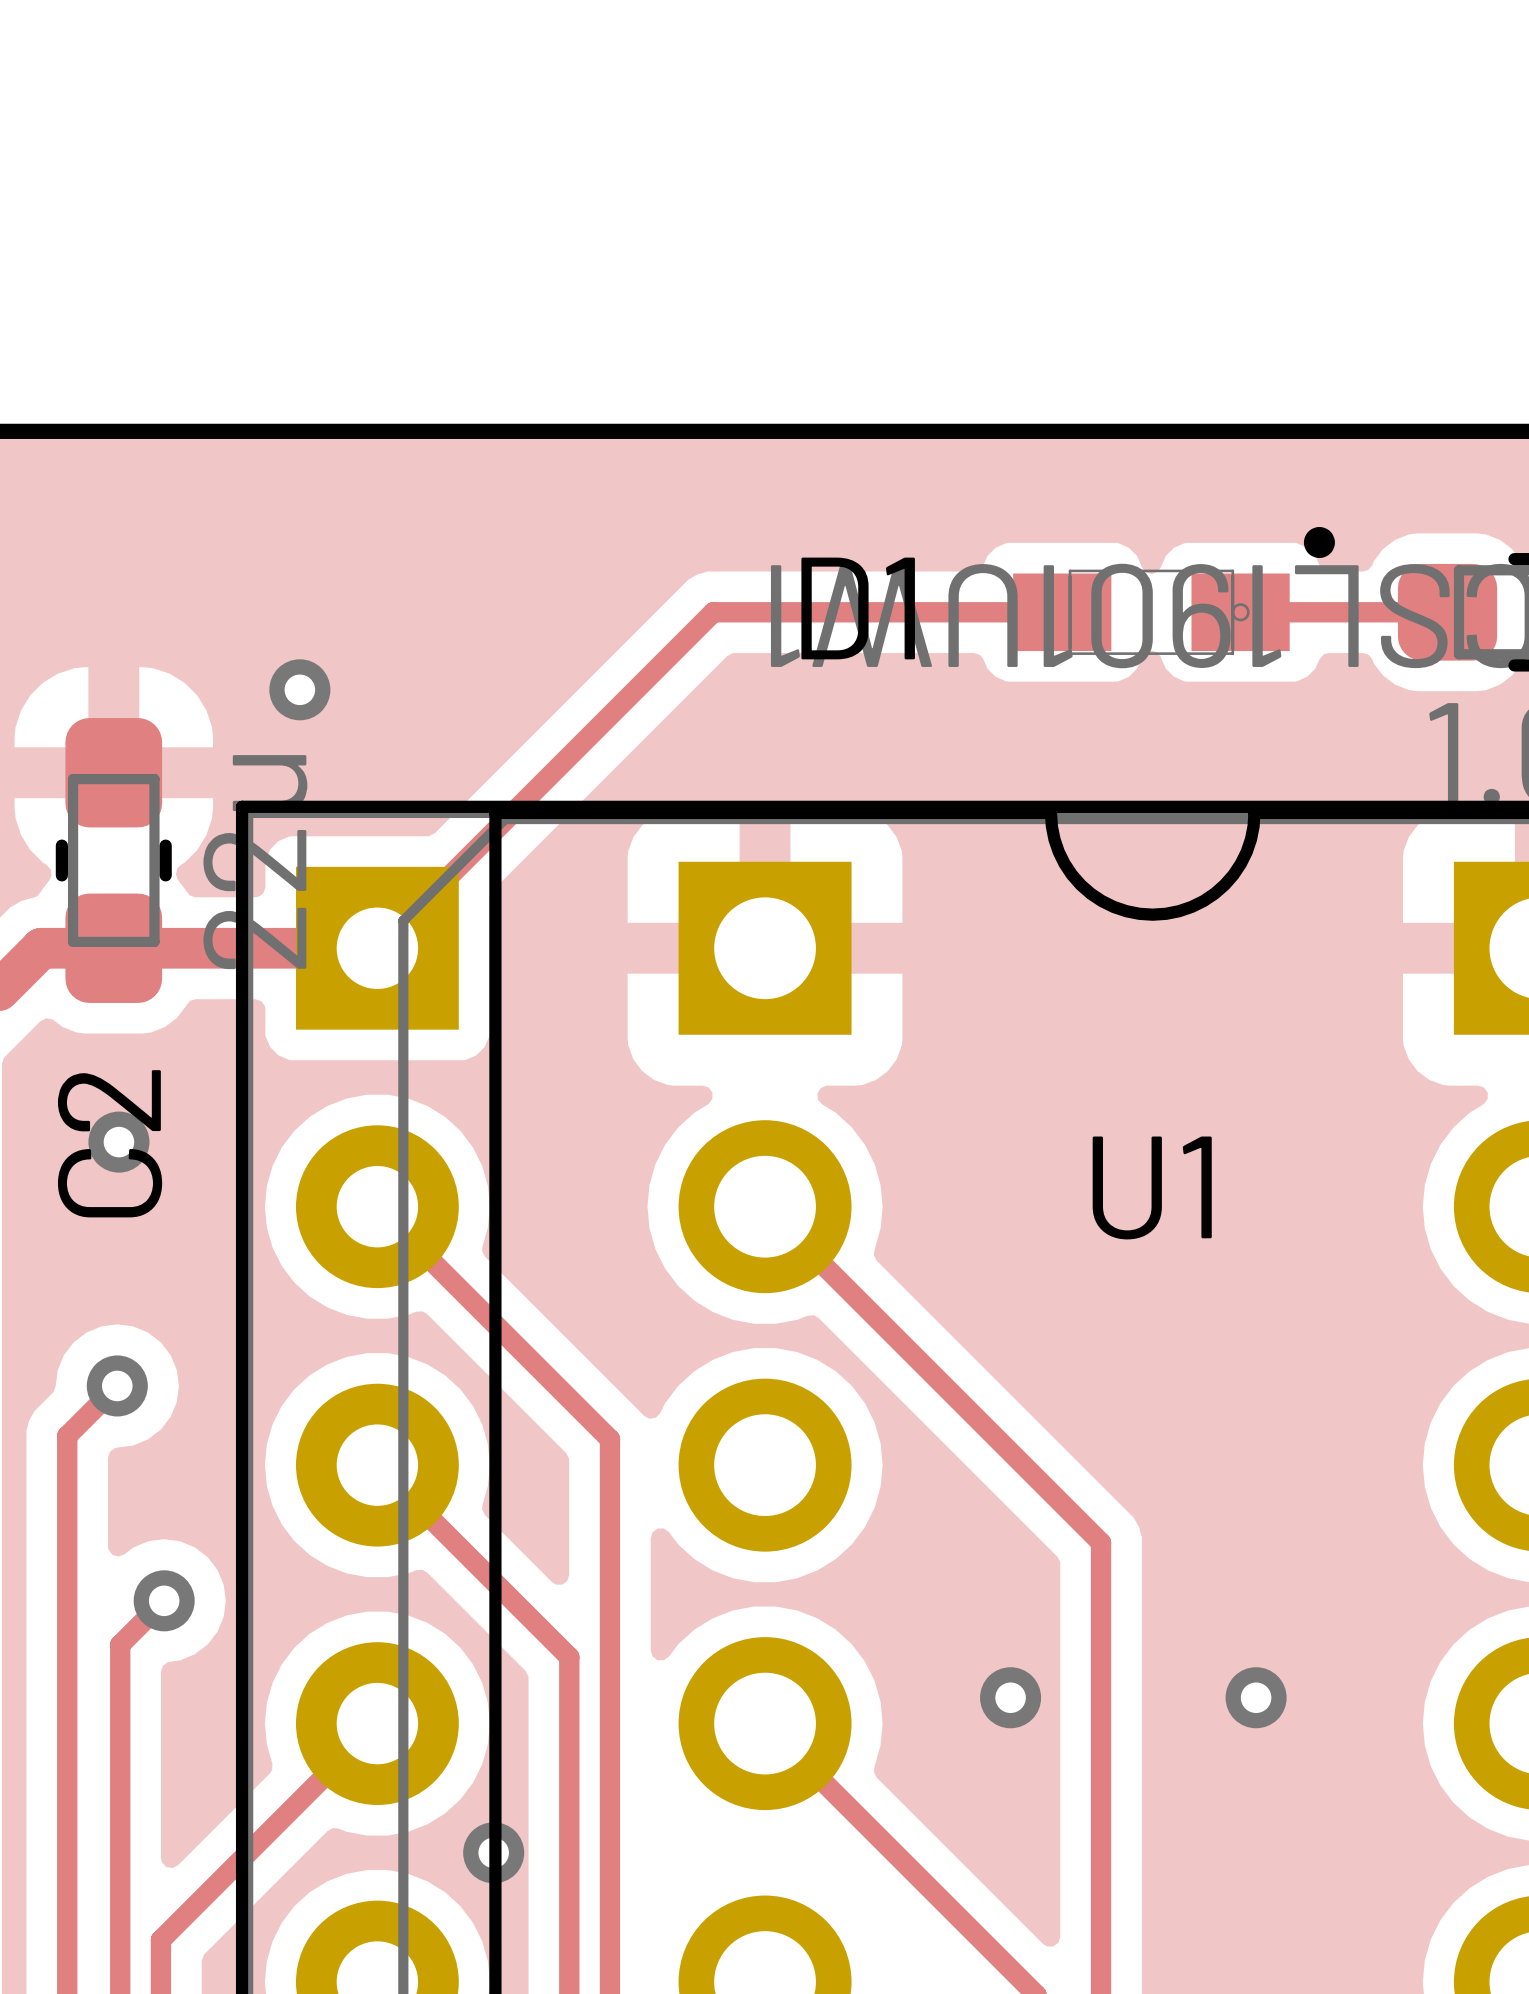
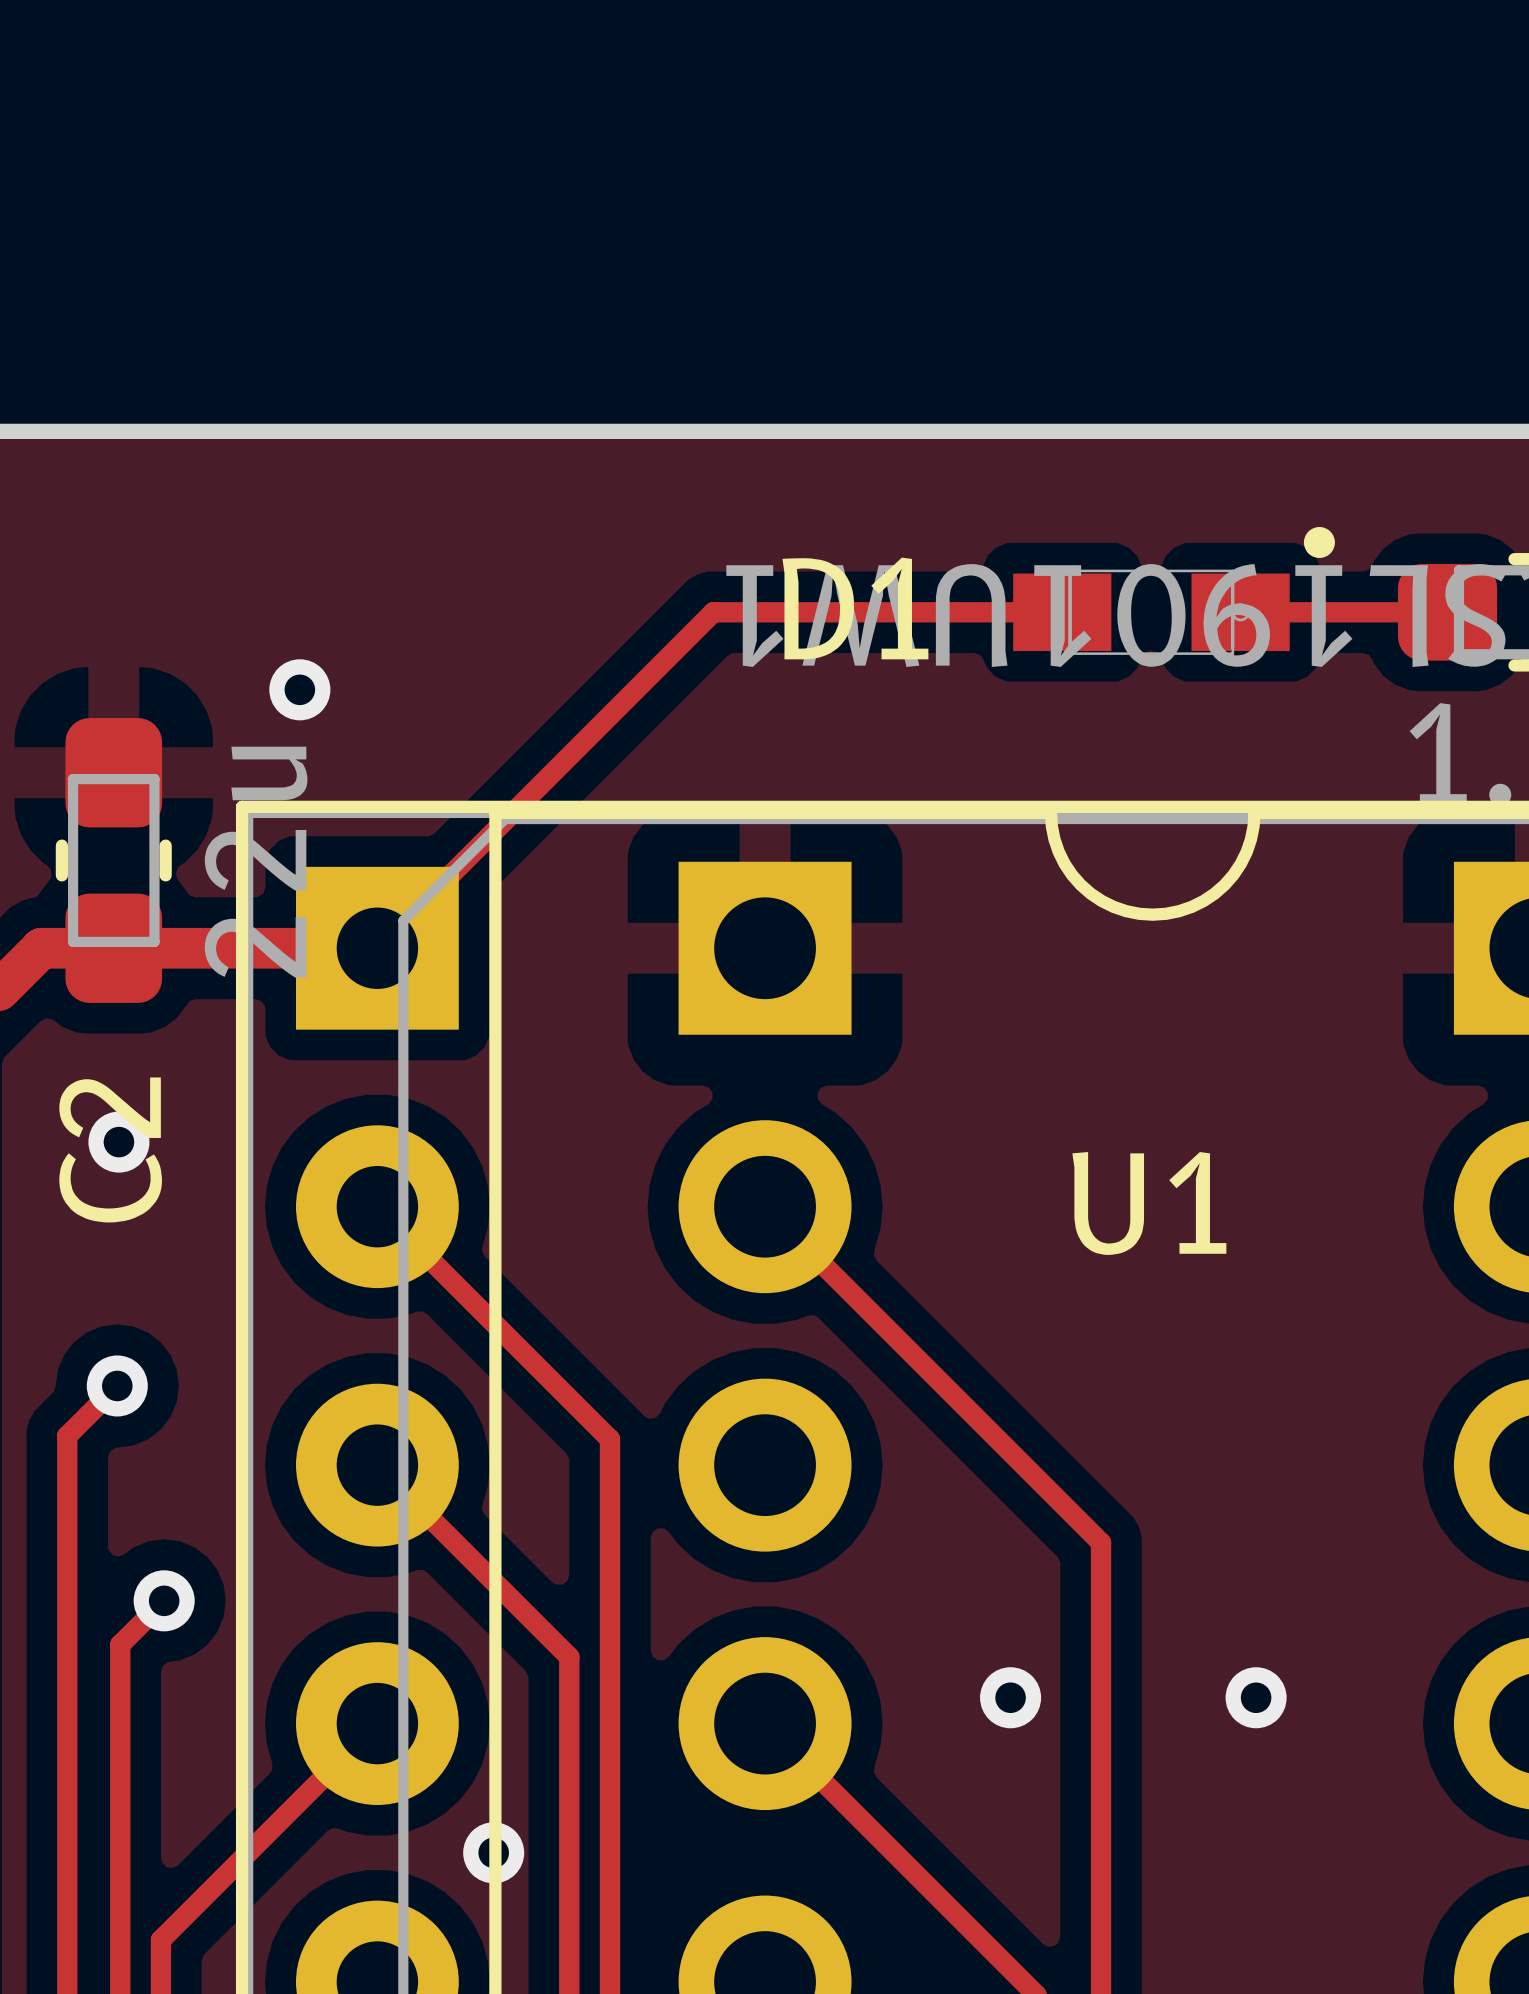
U1 name position: U1 (1152, 1187) -> U1 (1149, 1203)

